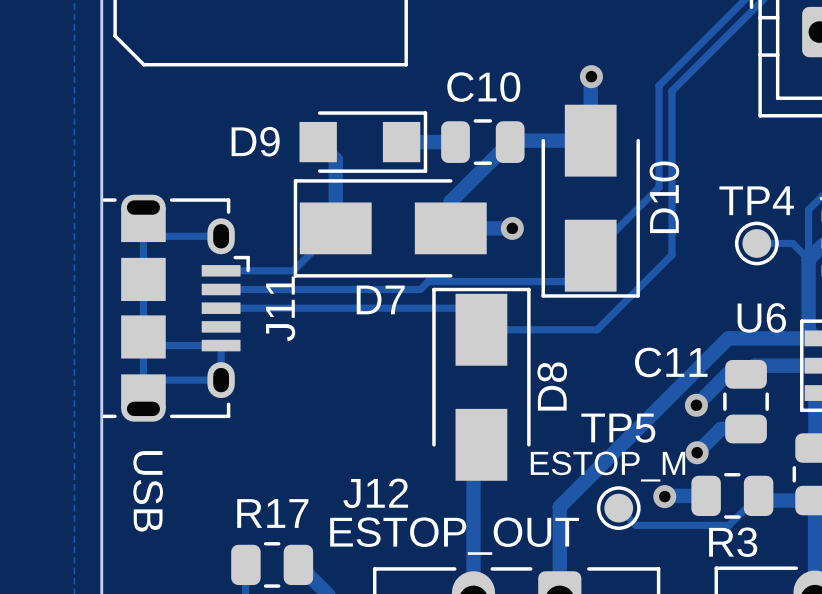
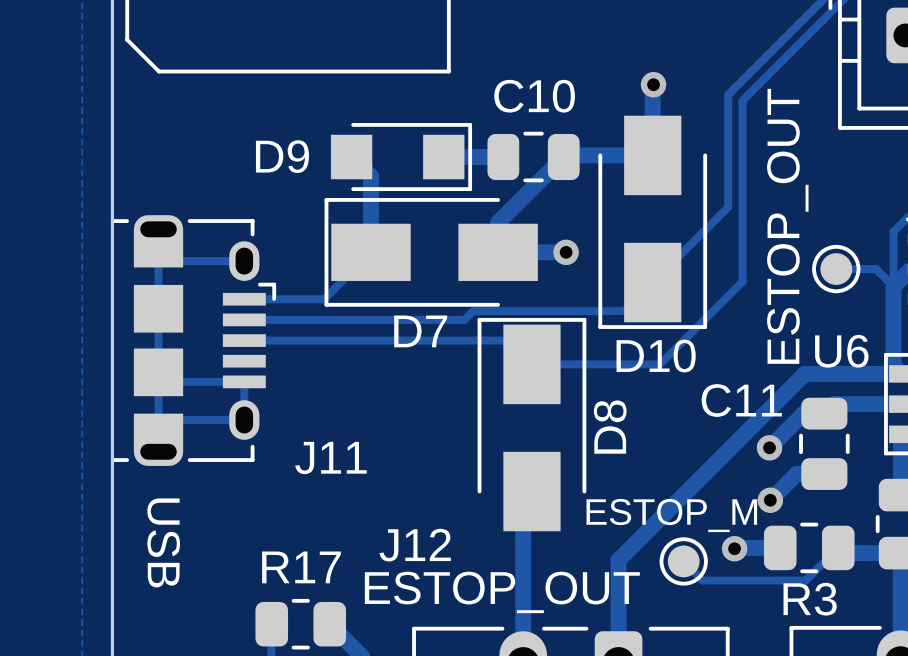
D10 name rotation: 0° (664, 197) -> 90° clockwise (656, 356)
D10 name position: D10 (664, 197) -> D10 (656, 356)
TP4 name: TP4 (756, 200) -> none
text: none -> ESTOP_OUT (787, 226)
J11 name rotation: 0° (280, 308) -> 90° clockwise (330, 457)
J11 name position: J11 (280, 308) -> J11 (330, 457)
TP5 name: TP5 (618, 428) -> none

